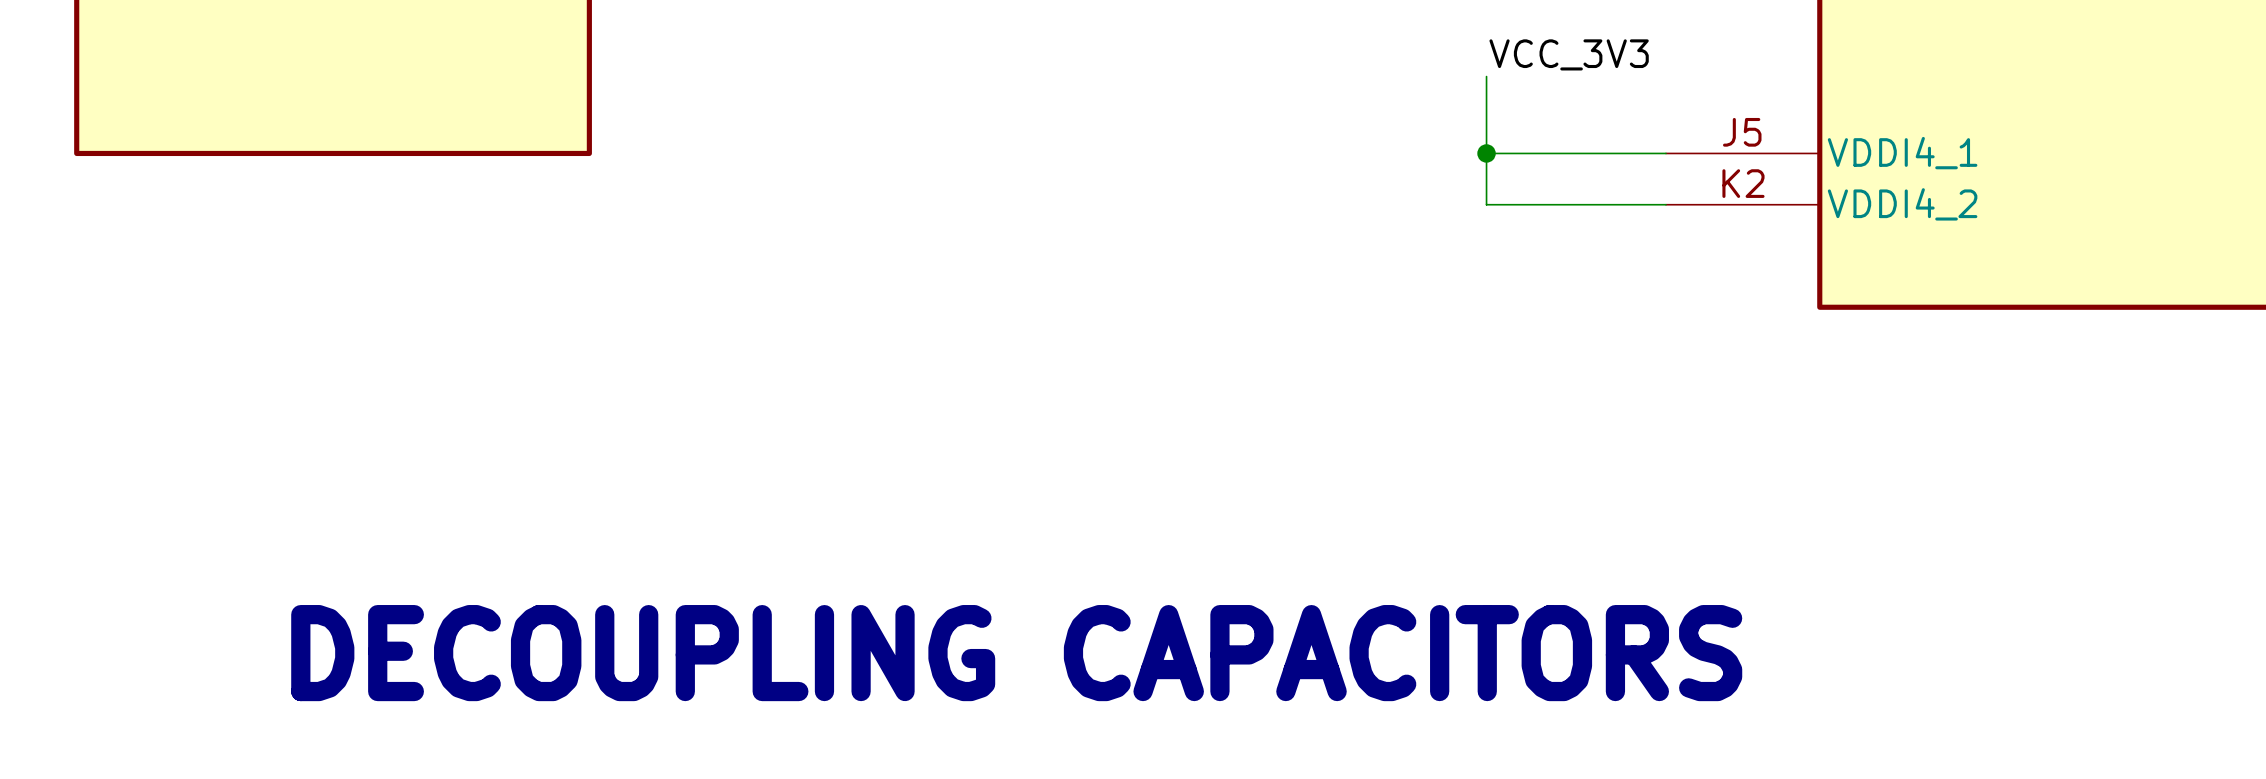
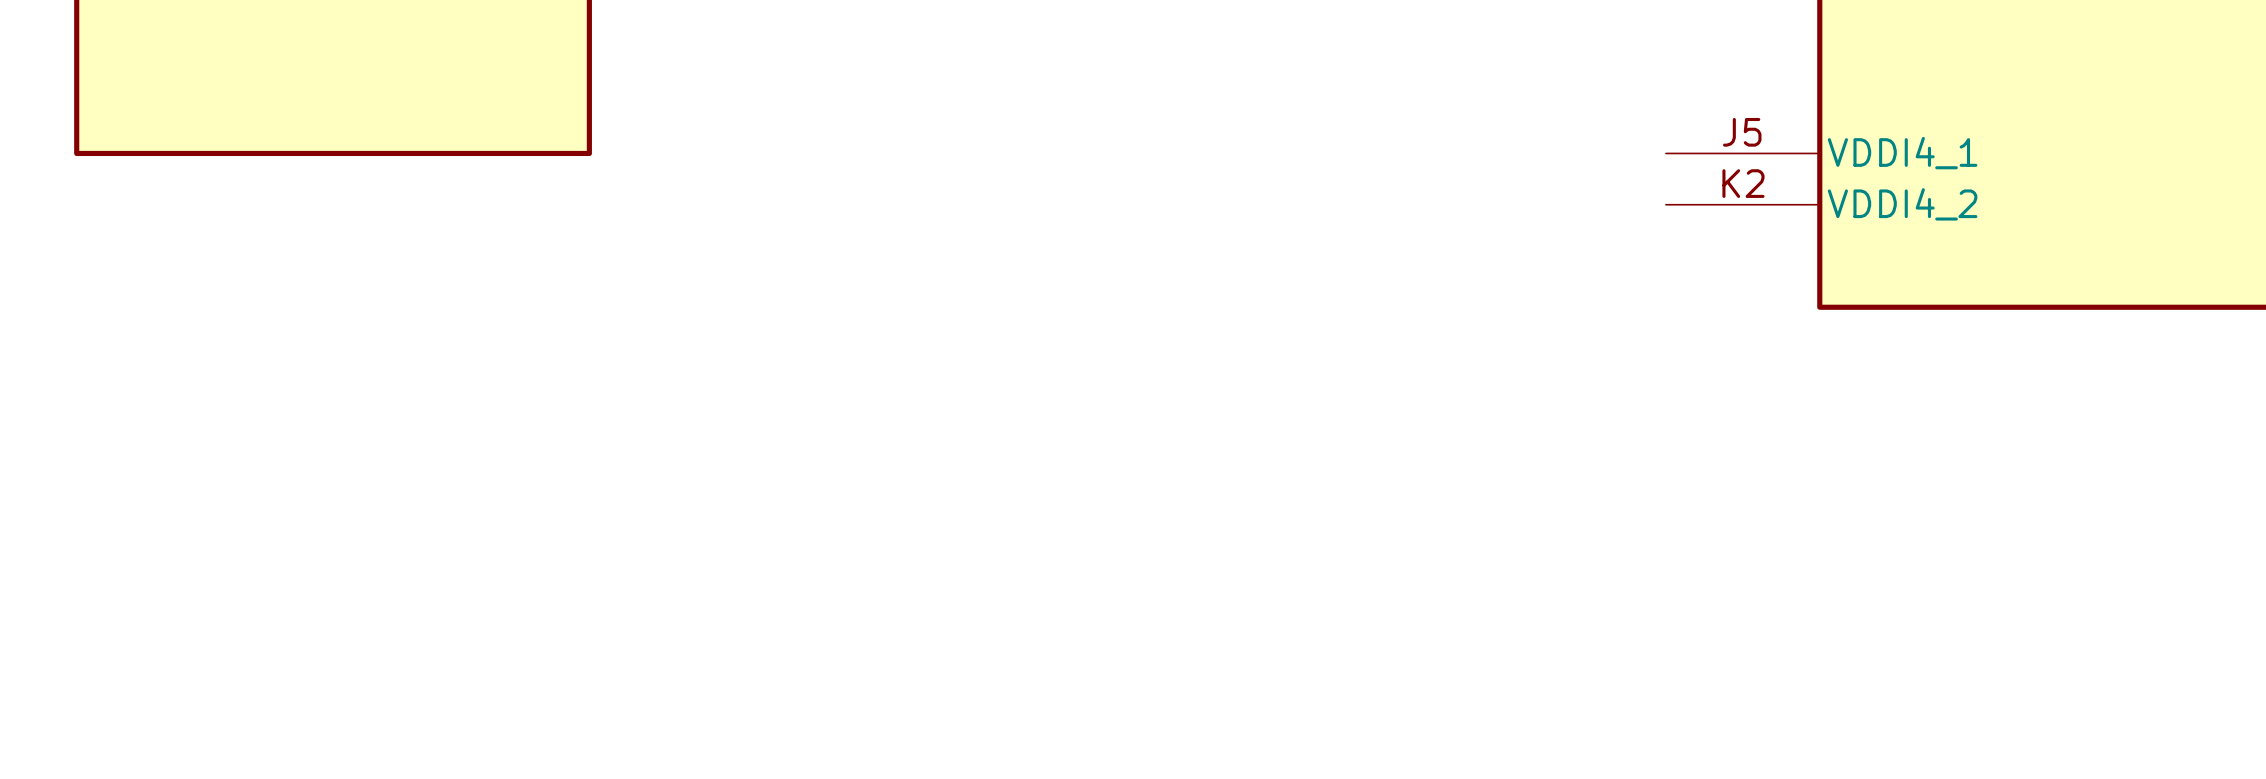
label: VCC_3V3 (1569, 54) -> none
wire: (1486, 76) (1486, 204) (1665, 204) -> none
wire: (1486, 153) (1665, 153) -> none
junction: (1486, 153) -> none
text: DECOUPLING CAPACITORS (1016, 653) -> none

